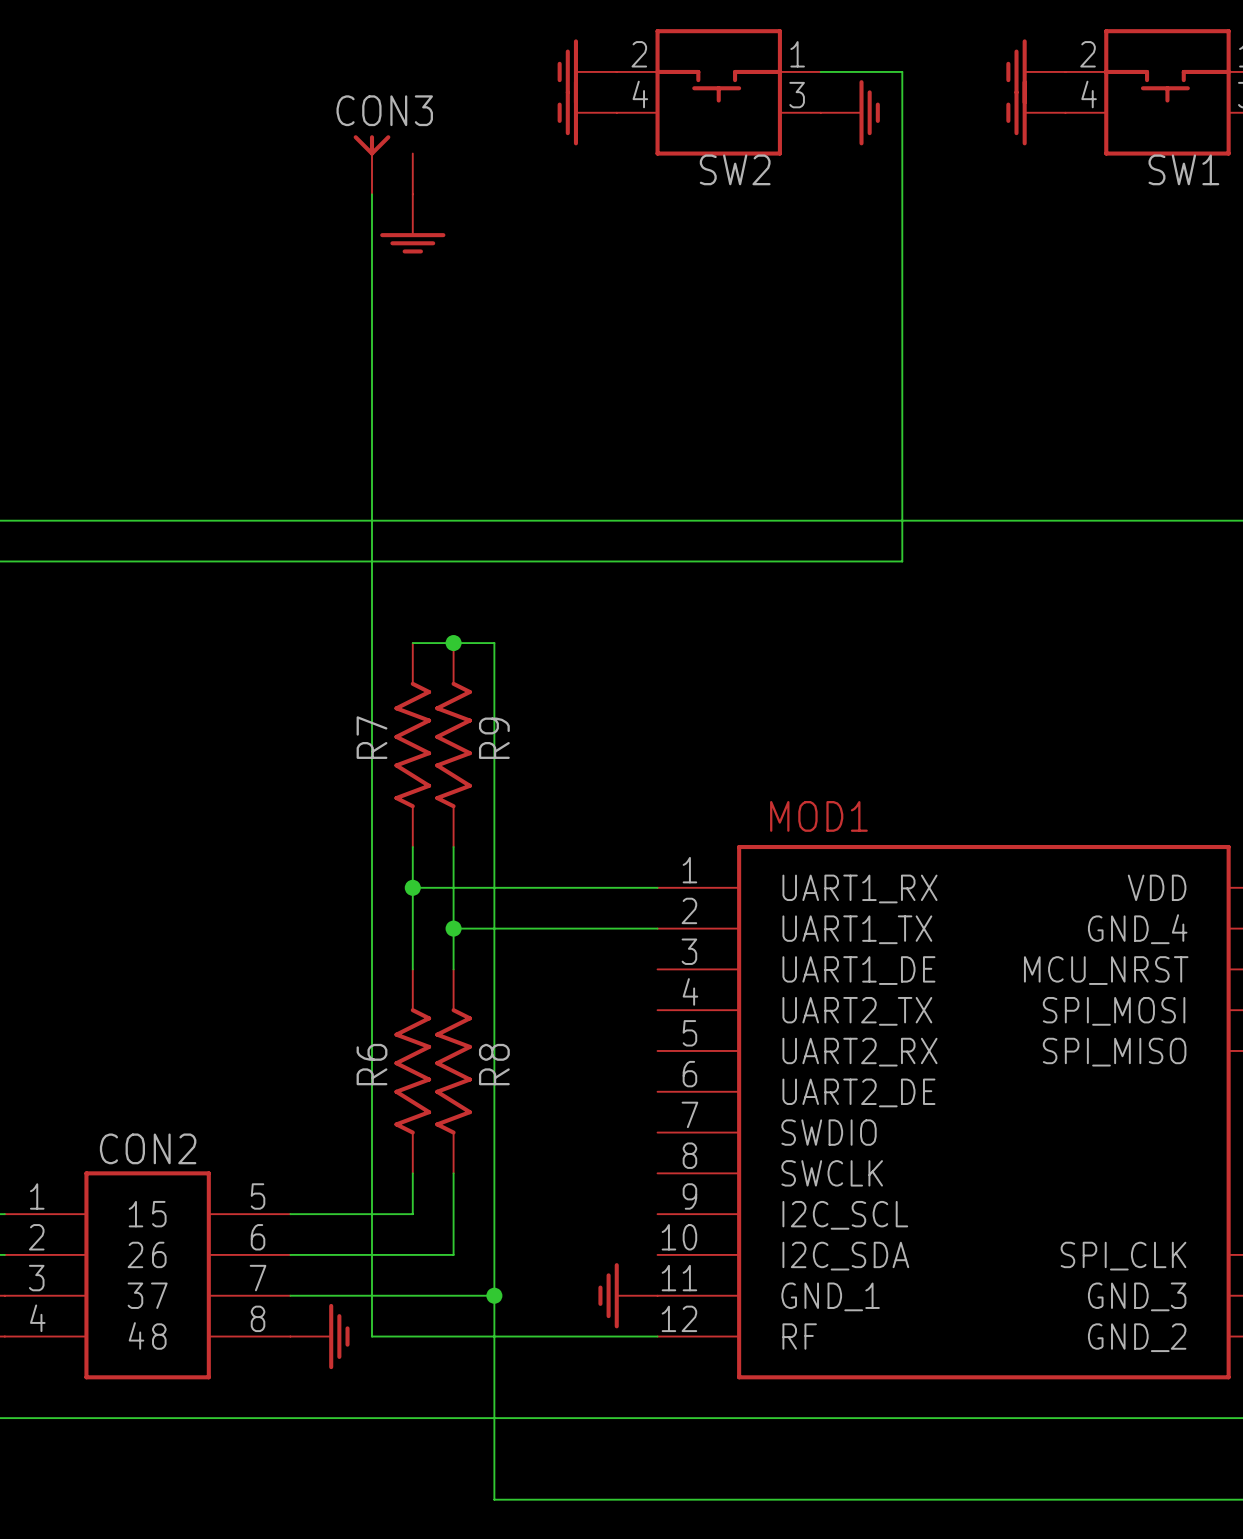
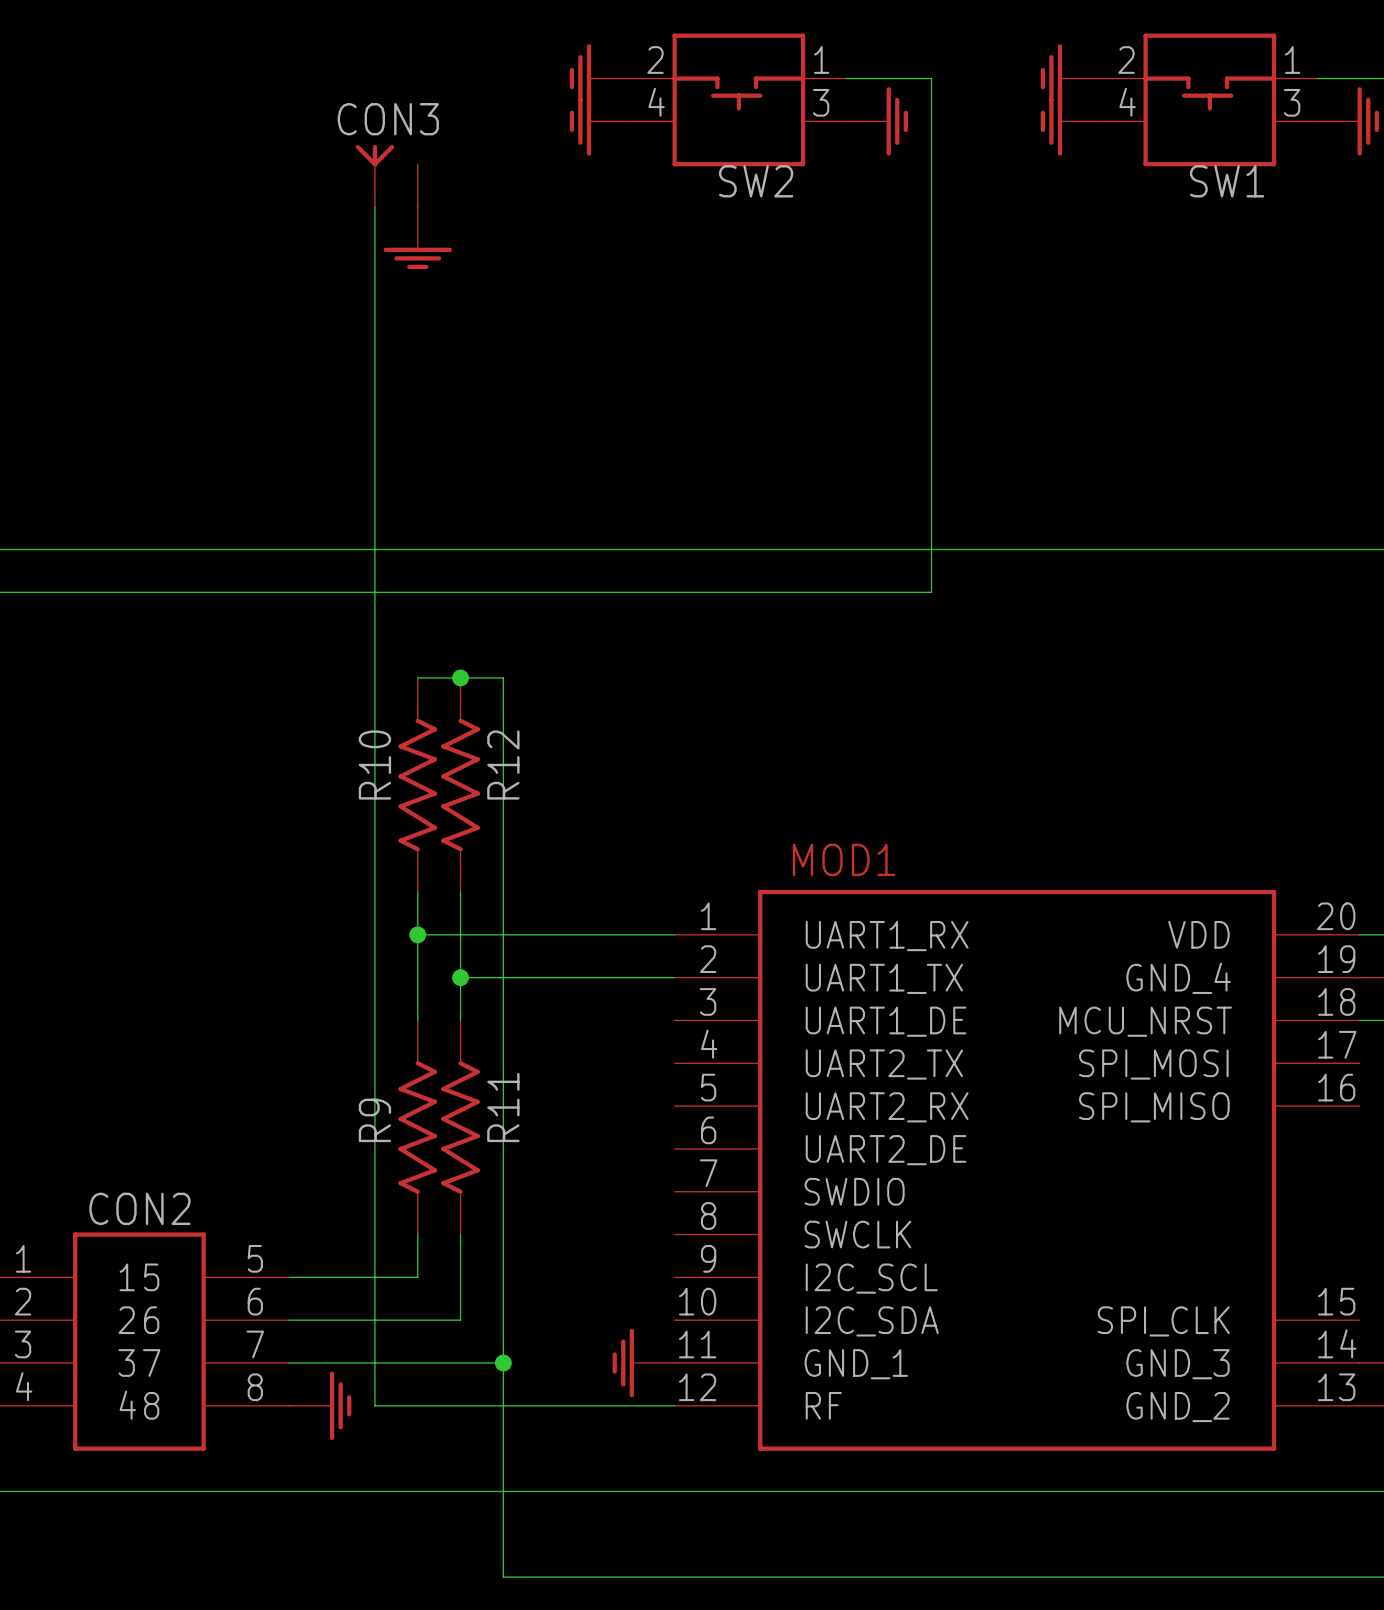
R7 name: R7 (372, 737) -> R10 (374, 765)
R9 name: R9 (494, 738) -> R12 (503, 765)
R6 name: R6 (372, 1064) -> R9 (374, 1120)
R8 name: R8 (494, 1064) -> R11 (503, 1107)

